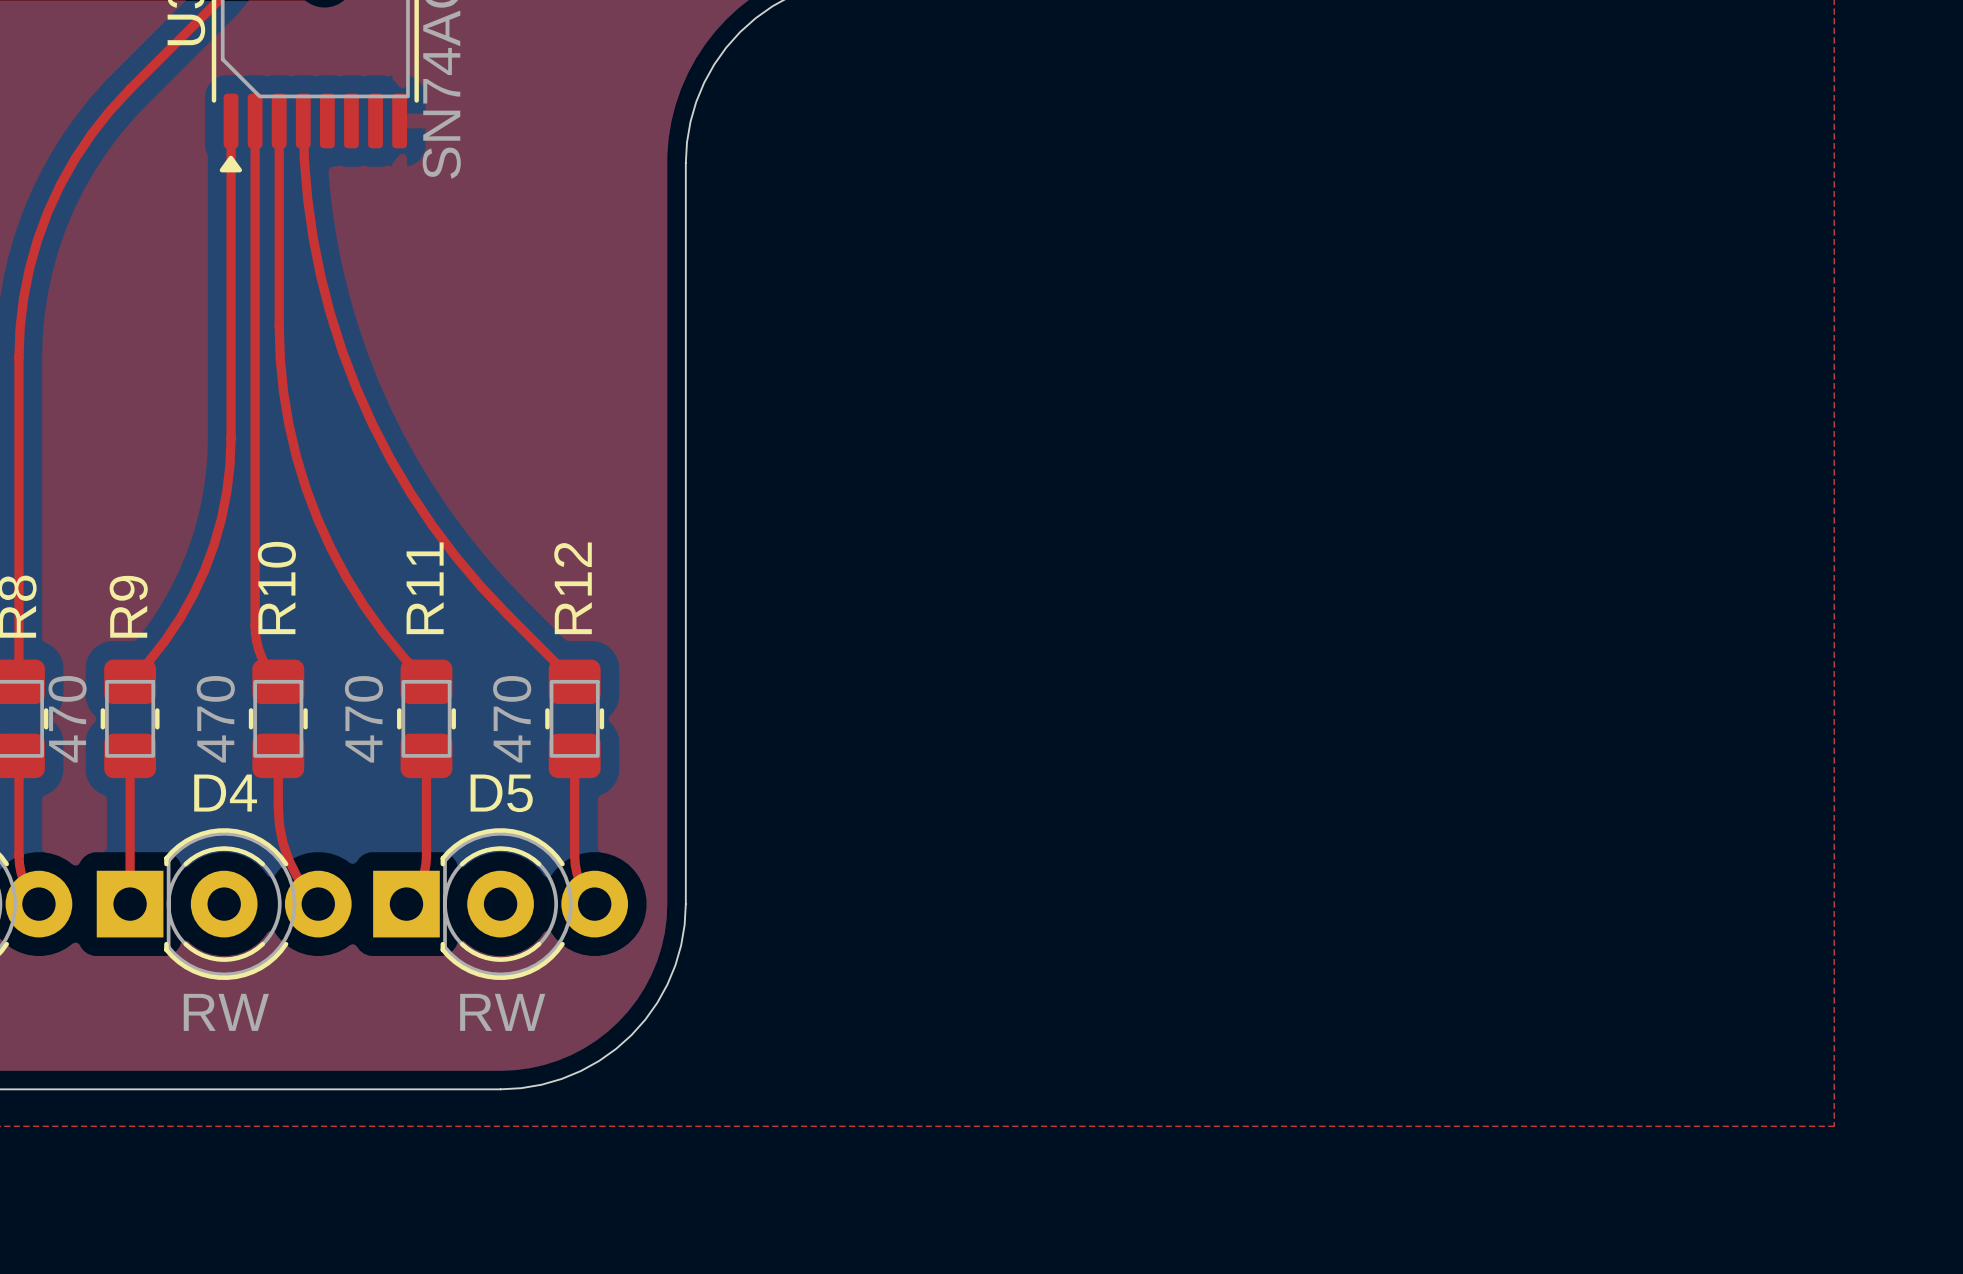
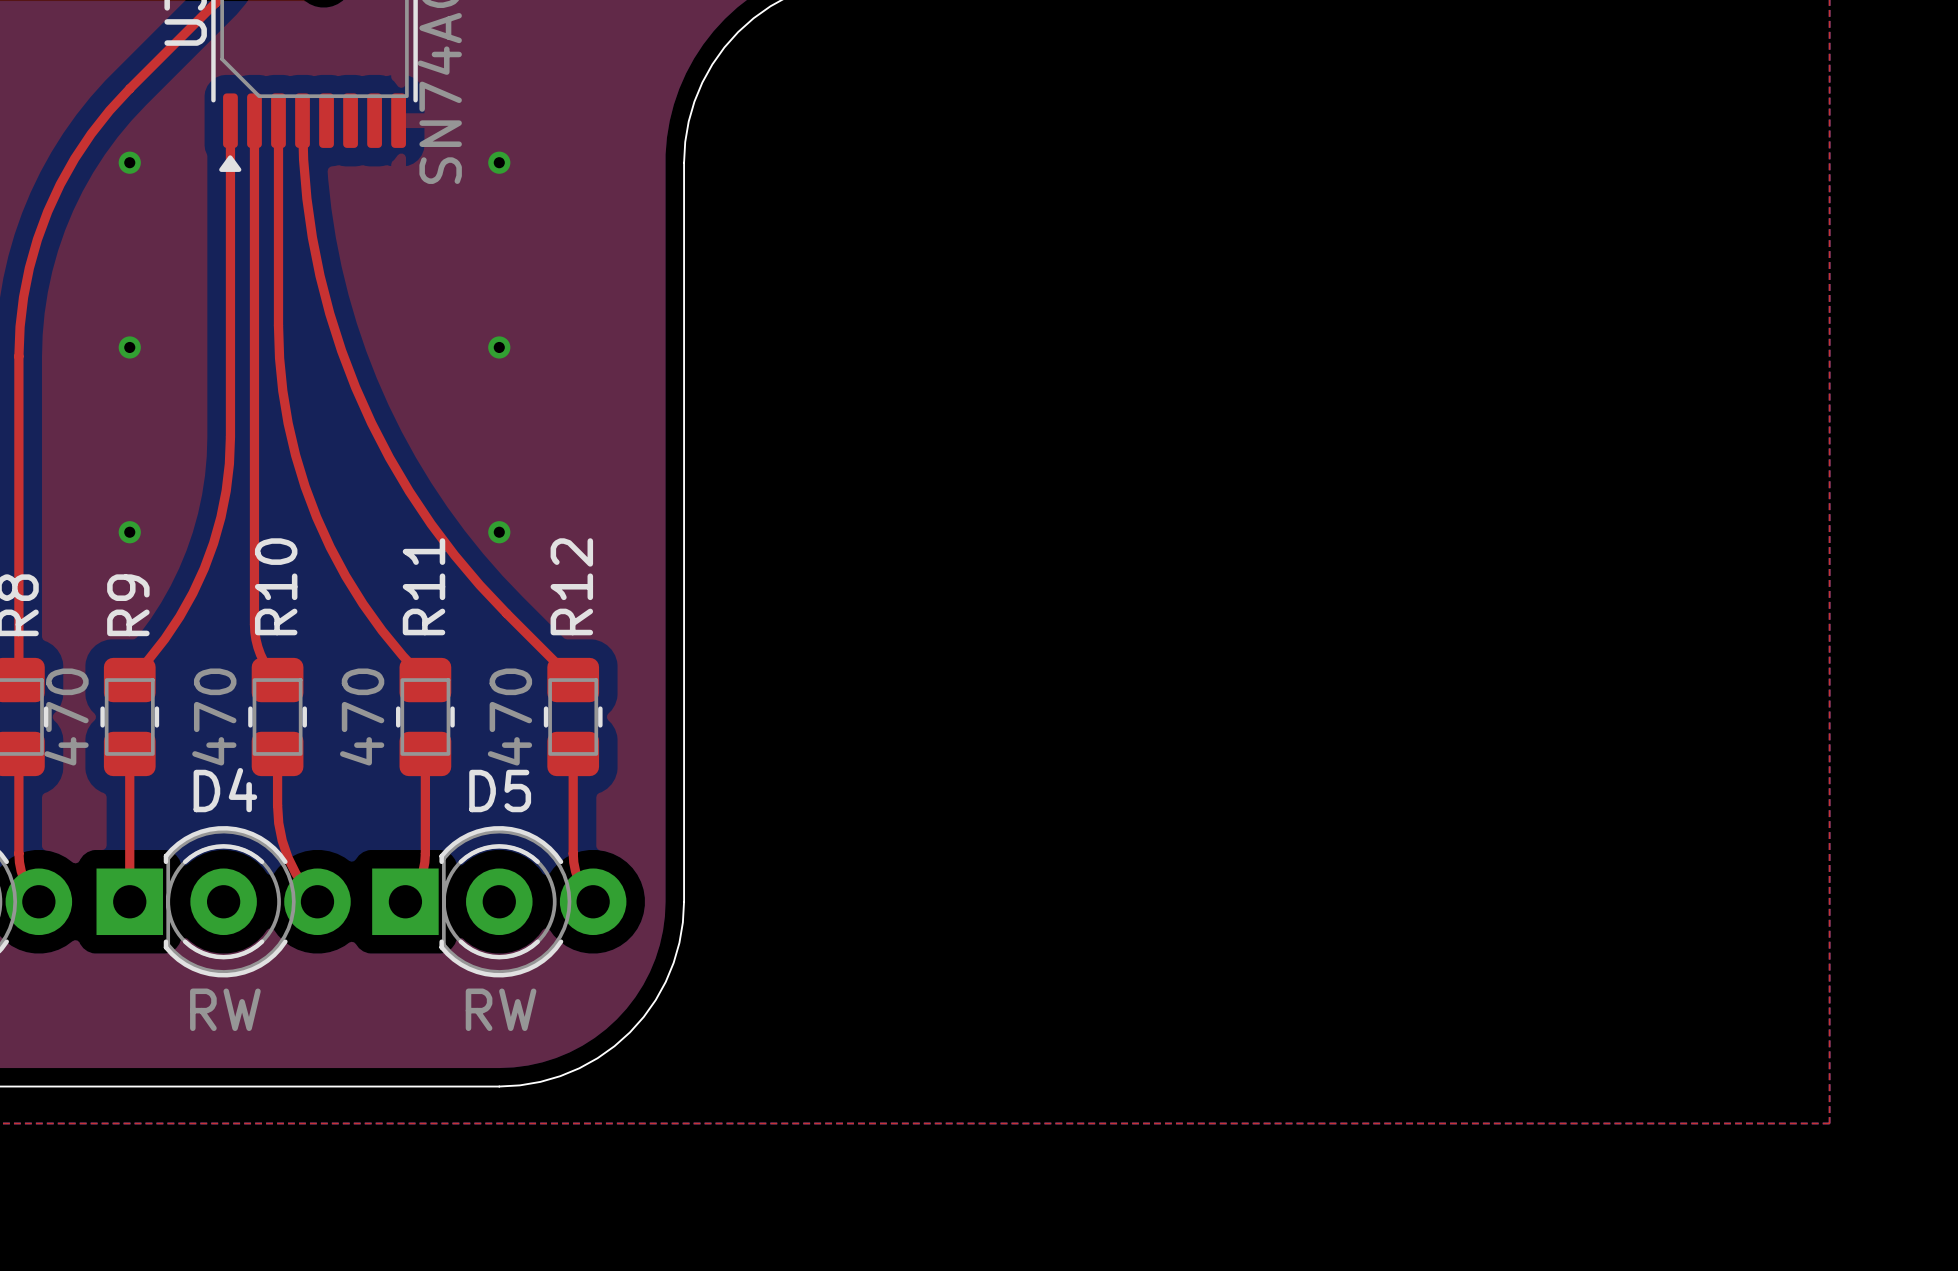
via: none -> (129, 162)
via: none -> (499, 162)
via: none -> (129, 347)
via: none -> (499, 347)
via: none -> (129, 532)
via: none -> (499, 532)

